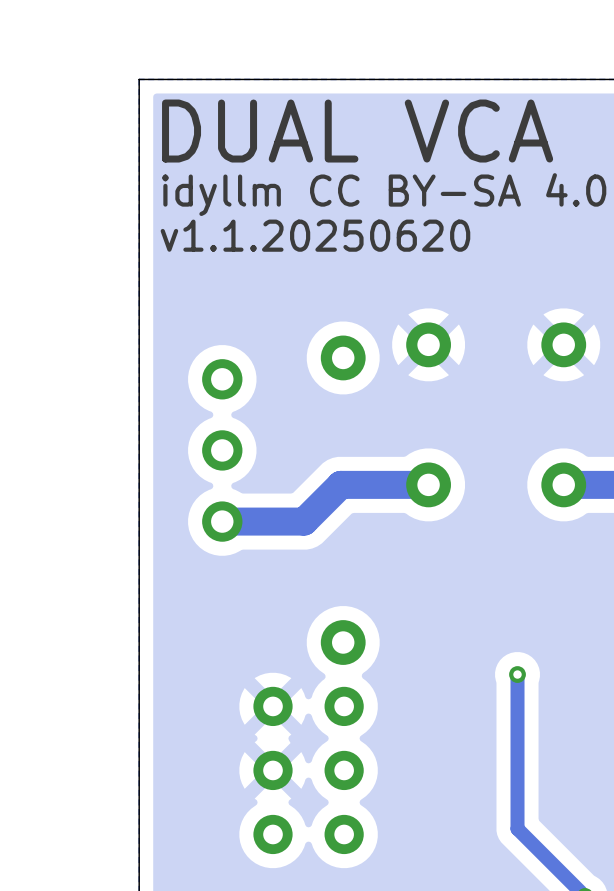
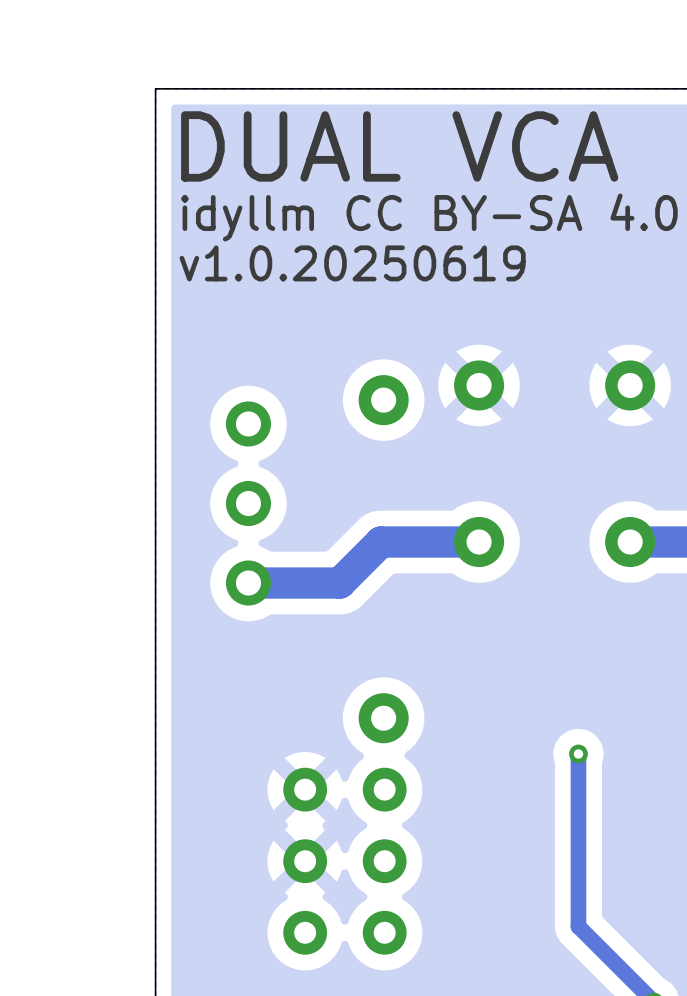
text: v1.1.20250620 (315, 235) -> v1.0.20250619 (352, 263)

